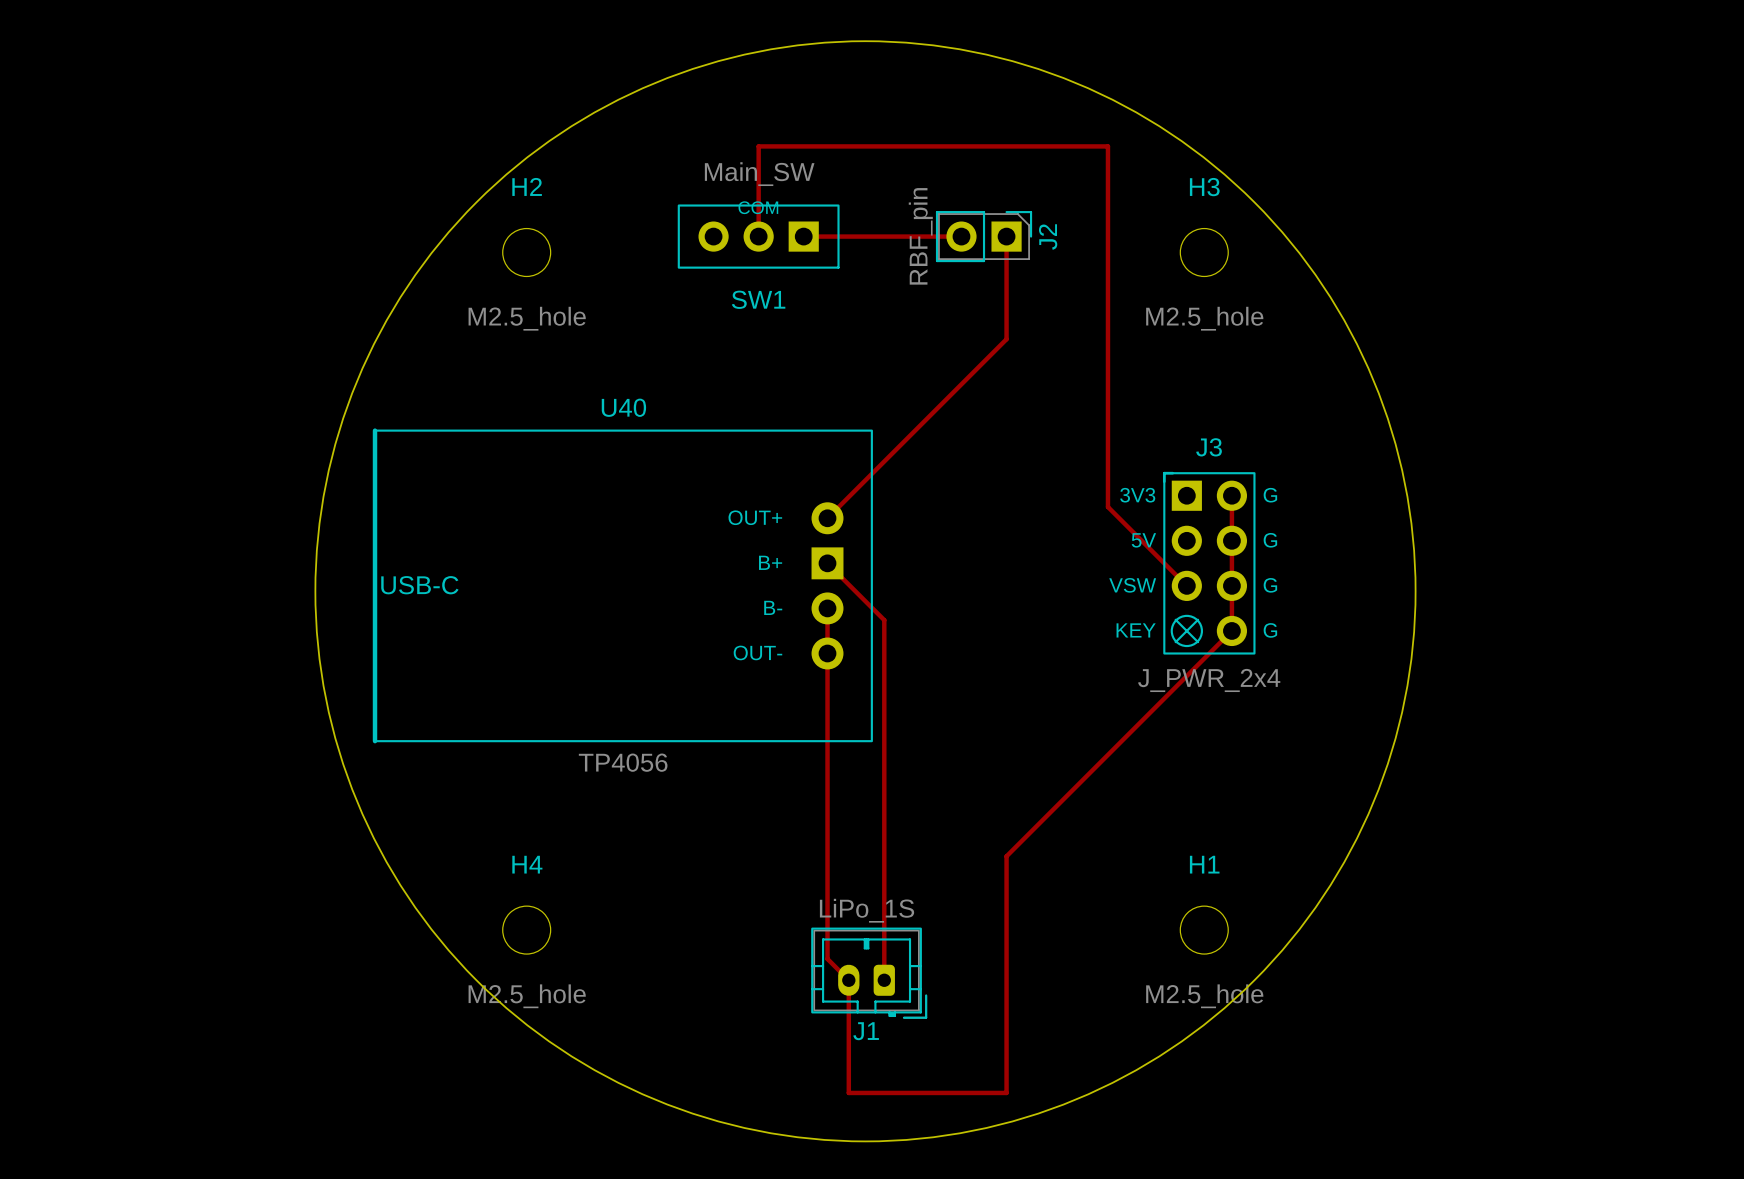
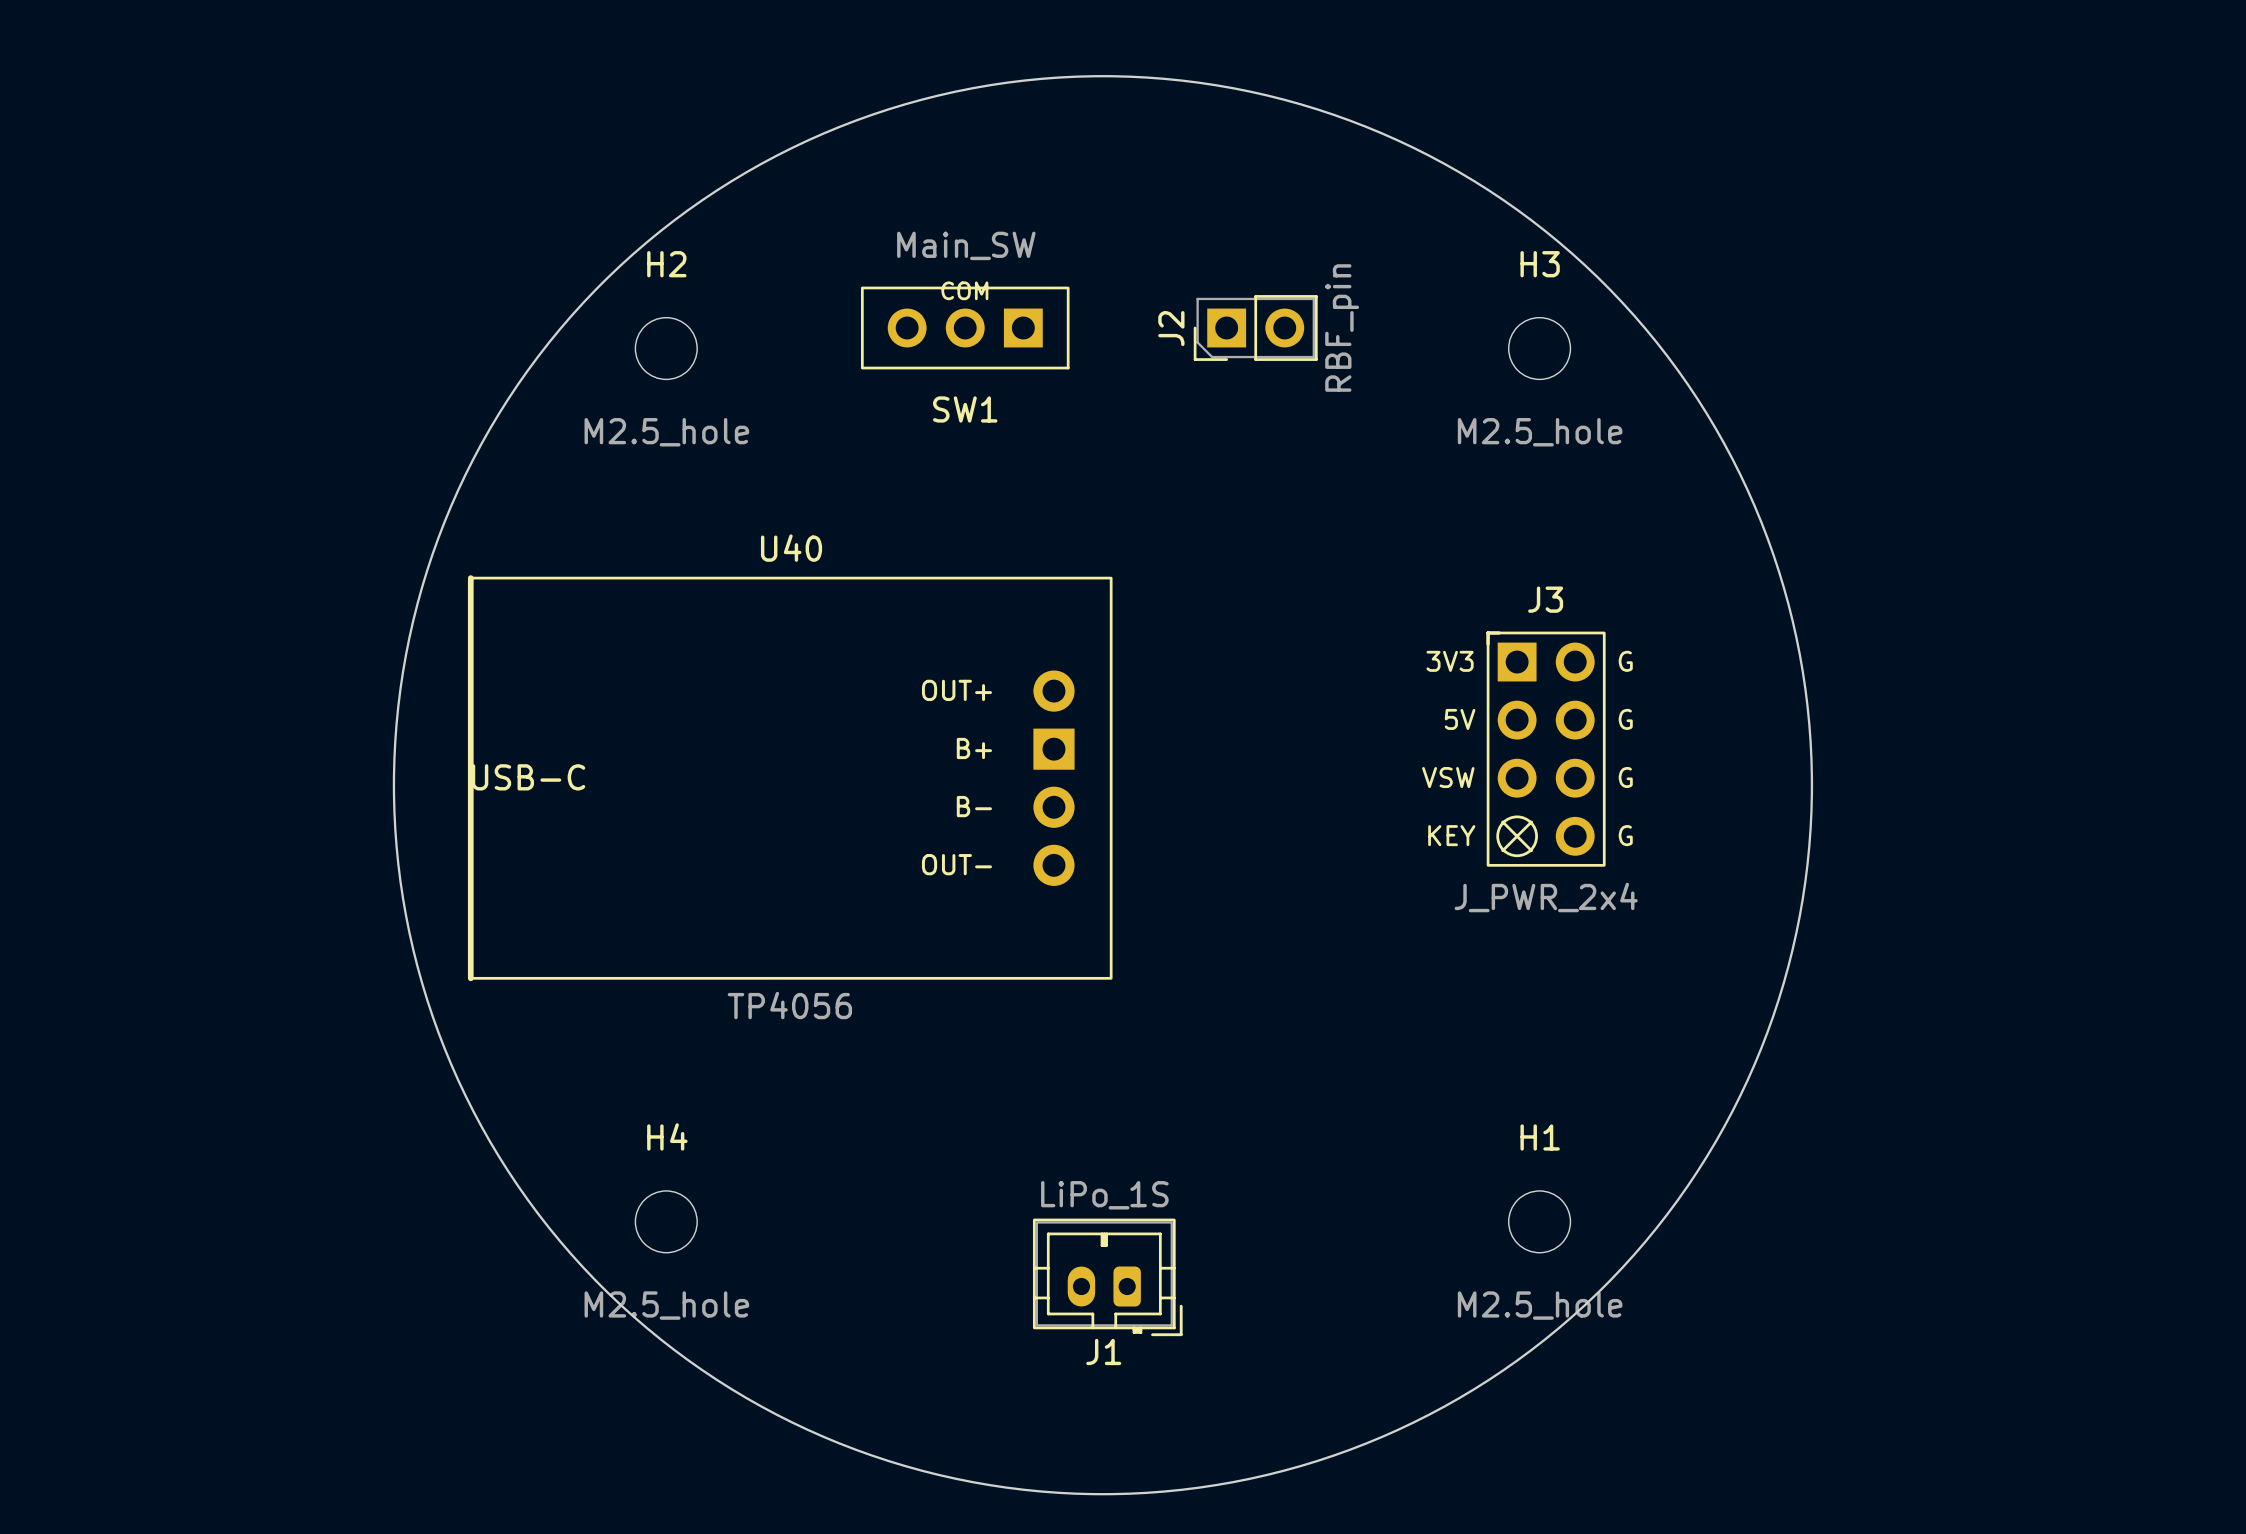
track: (758, 236) (758, 146) (1107, 146) (1107, 507) (1186, 585) -> none
track: (803, 236) (961, 236) -> none
J2 rotation: 0° (984, 236) -> 180° (1255, 328)
track: (1006, 236) (1006, 339) (827, 518) -> none
track: (1231, 495) (1231, 630) (1006, 856) (1006, 1092) (848, 1092) (848, 980) (827, 958) (827, 608) -> none
track: (827, 563) (884, 620) (884, 980) -> none

